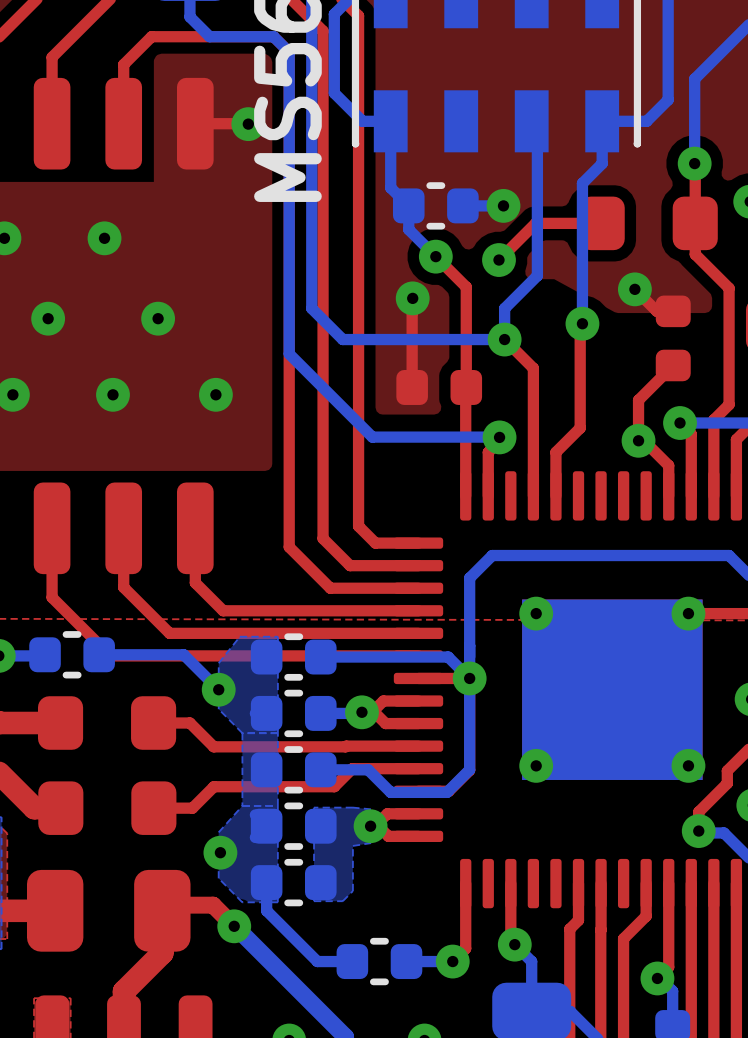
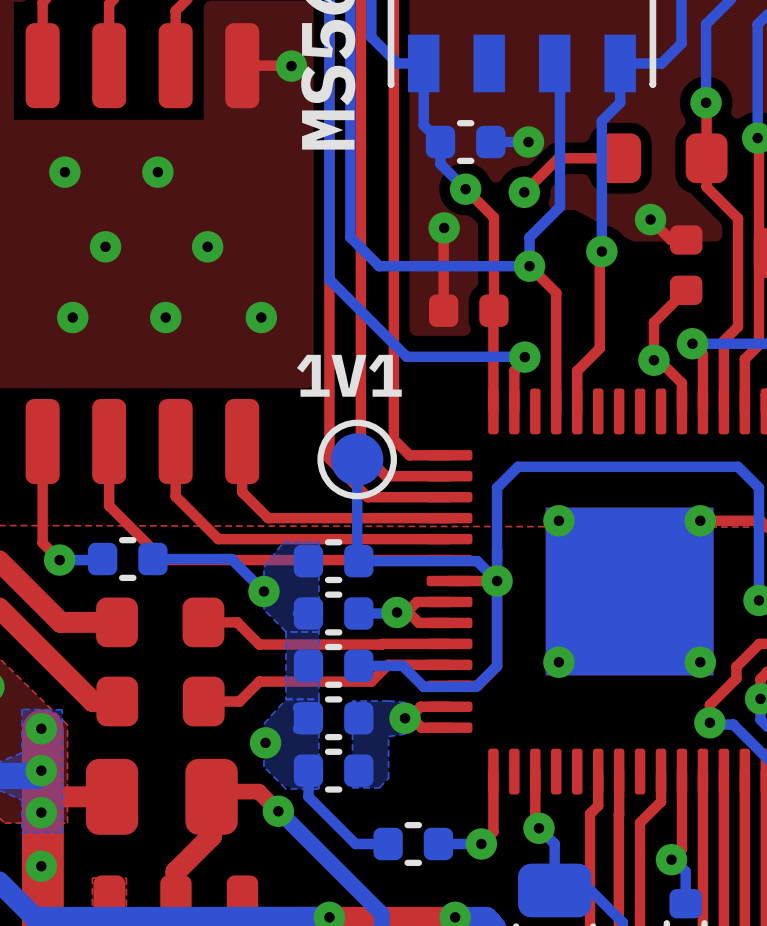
text: none -> 1V1 (349, 375)
bottom track: none -> (357, 459) (357, 559) (358, 561)
part: none -> (357, 459)

